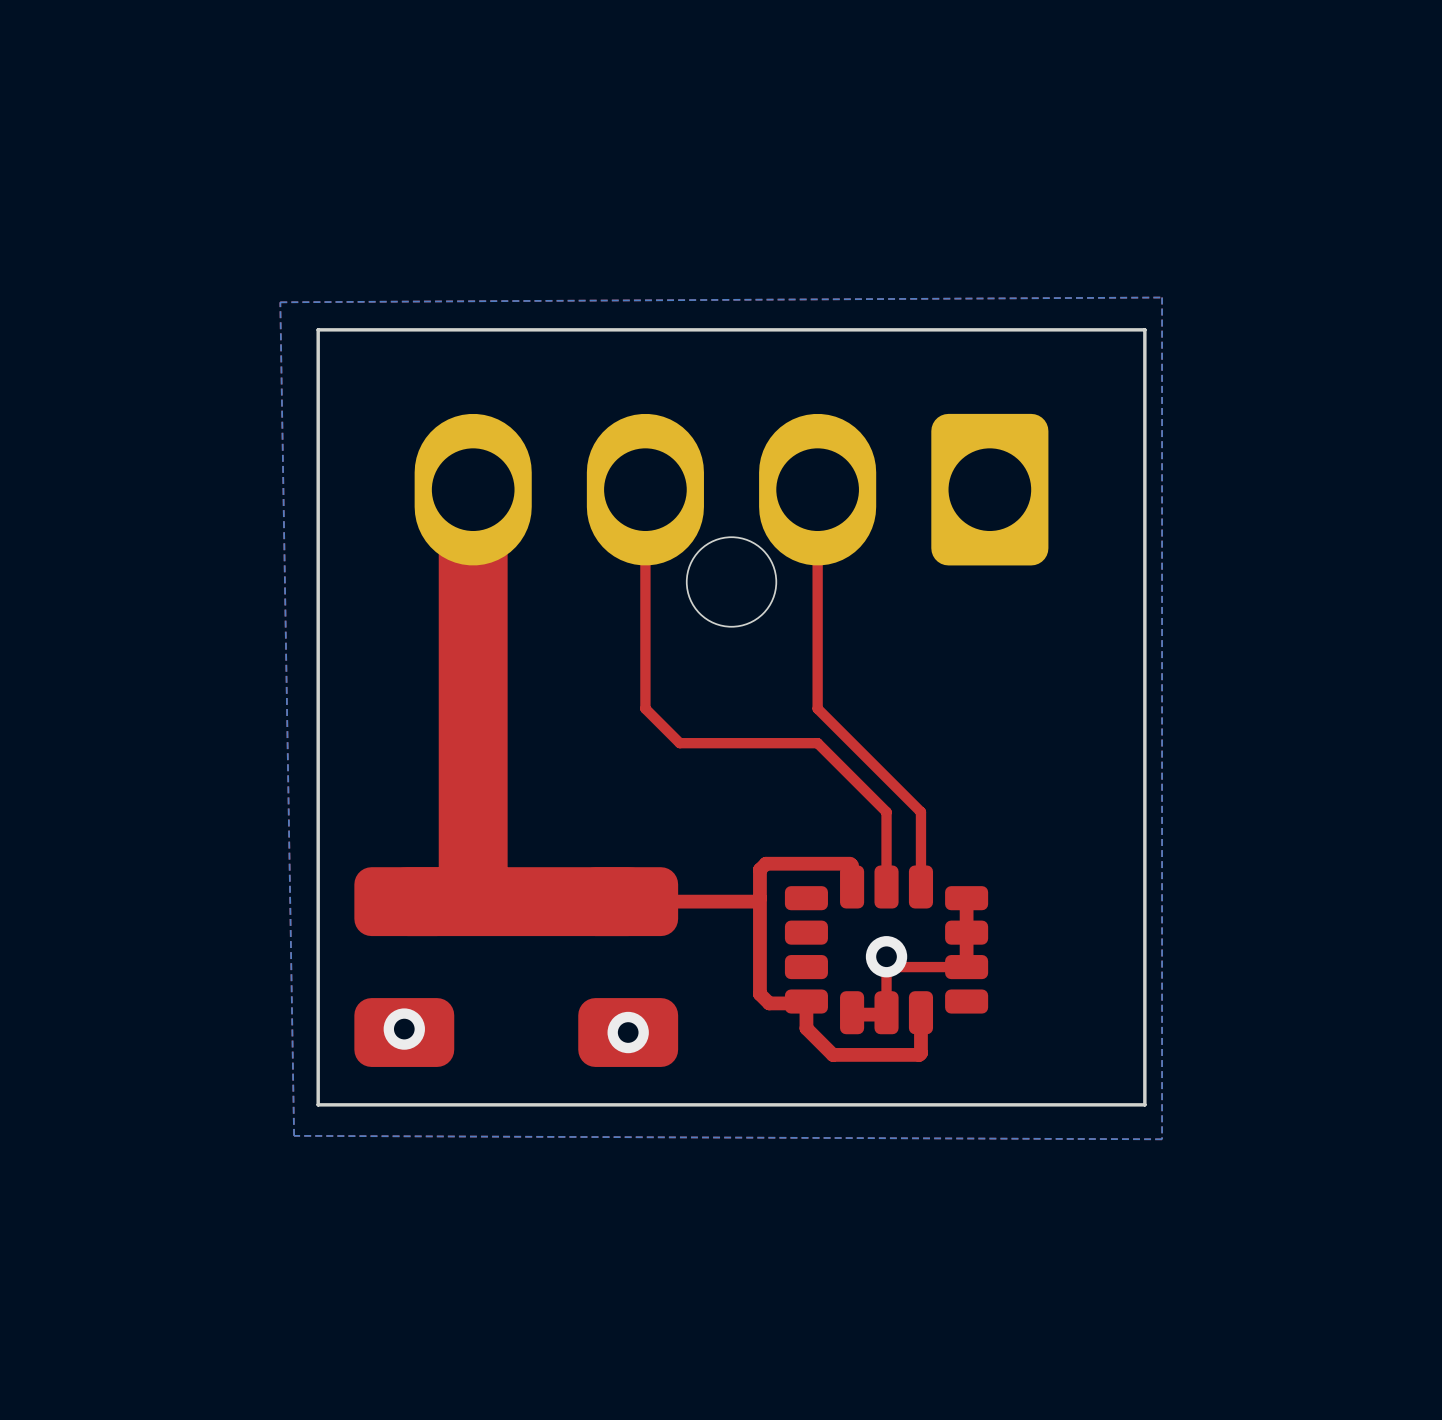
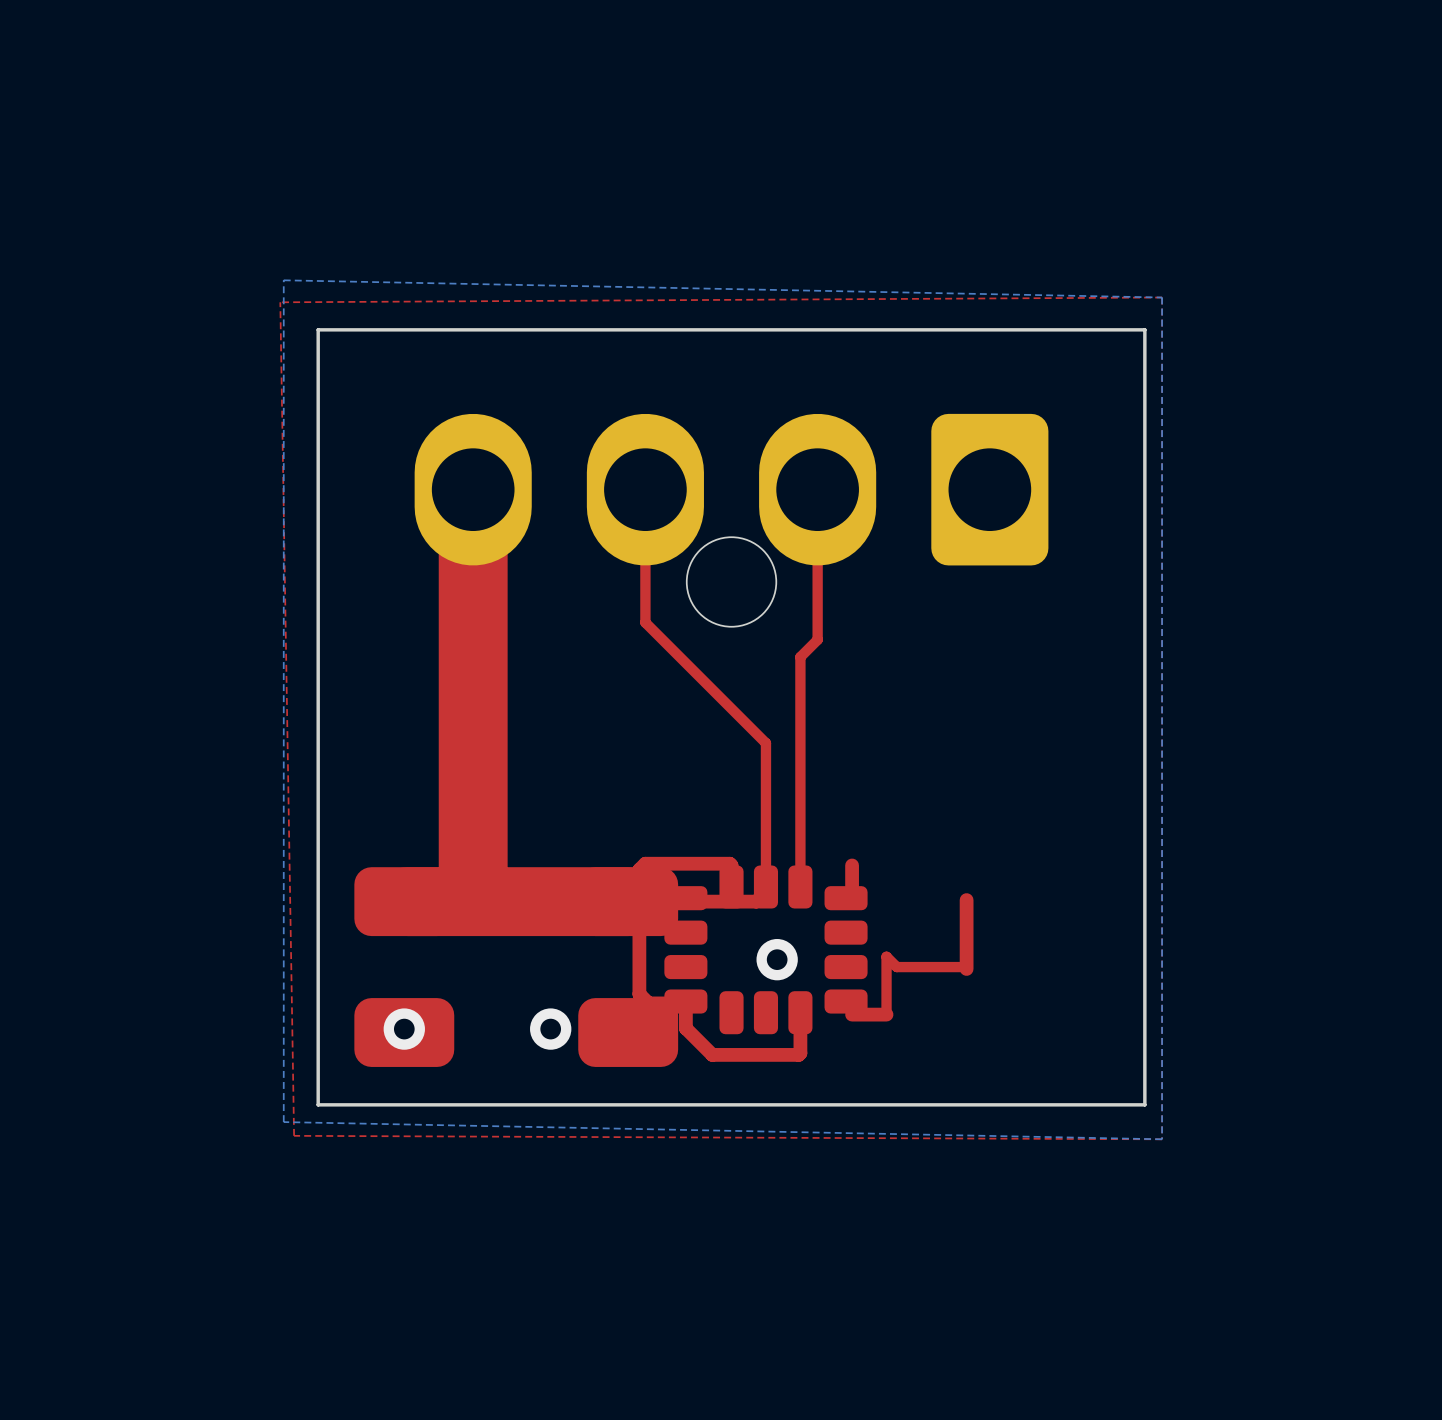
bottom zone outline: (1162, 297) (280, 302) (294, 1135) (1162, 1139) -> (1162, 297) (283, 280) (283, 1122) (1162, 1139)
top track: (645, 622) (645, 708) (679, 743) (817, 743) (886, 812) (886, 886) -> (645, 622) (765, 743) (765, 886)
top track: (817, 639) (817, 708) (920, 812) (920, 886) -> (817, 639) (800, 657) (800, 886)
top track: (850, 863) (765, 863) (759, 869) (759, 994) (769, 1003) (806, 1003) (806, 1028) (832, 1054) (919, 1054) (920, 1053) (920, 1012) -> none
top track: none -> (731, 886) (731, 865) (729, 863) (645, 863) (639, 869) (639, 994) (648, 1003) (685, 1003) (685, 1028) (712, 1054) (798, 1054) (800, 1053) (800, 1012)
part position: (886, 949) -> (765, 949)
via: (886, 956) -> none
via: none -> (777, 959)
via position: (628, 1032) -> (550, 1029)

